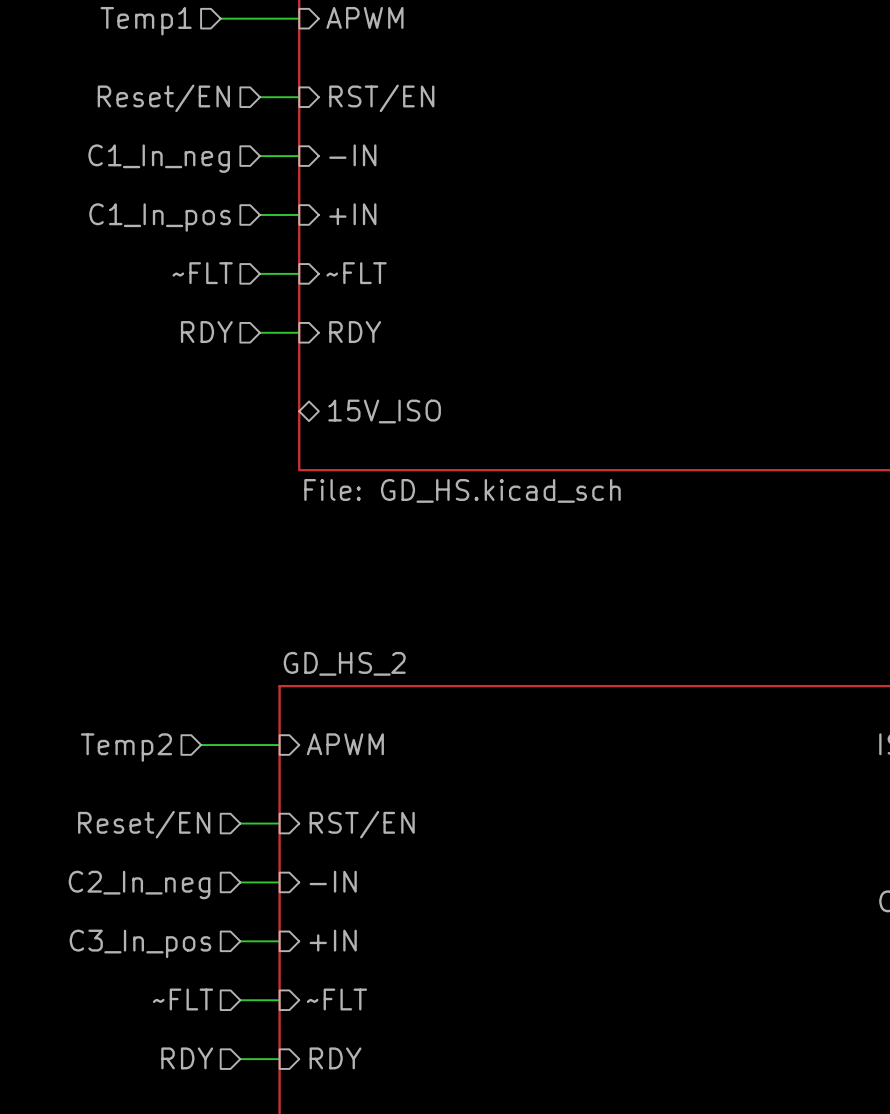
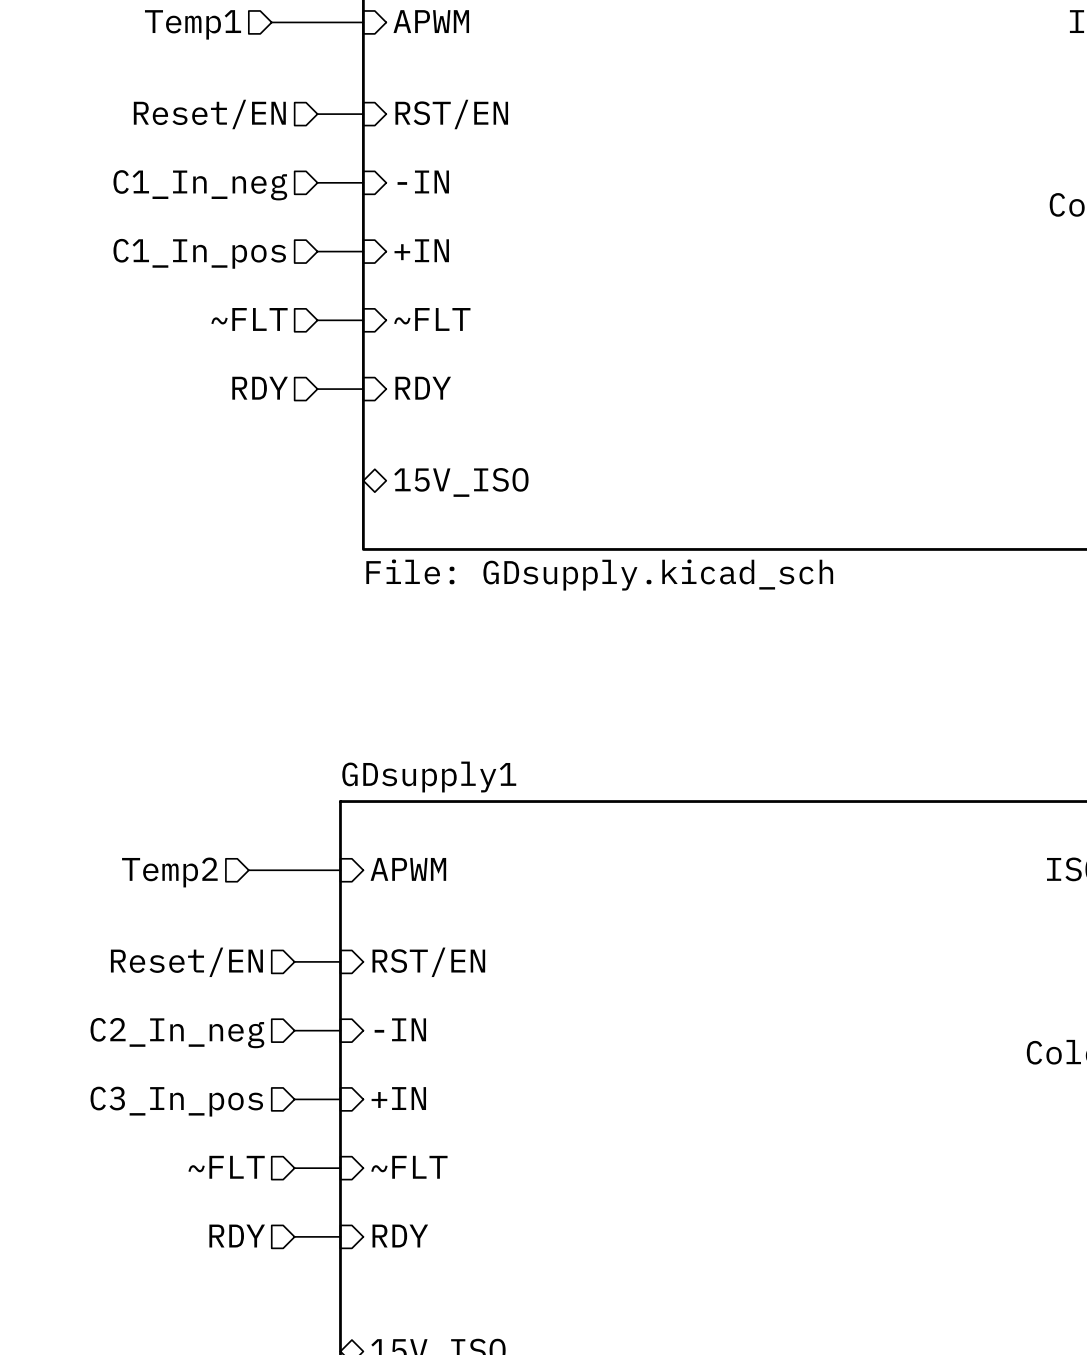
sheet value: File: GD_HS.kicad_sch (462, 490) -> File: GDsupply.kicad_sch (599, 575)
sheet GD_HS_2 name: GD_HS_2 (344, 663) -> GDsupply1 (429, 777)

